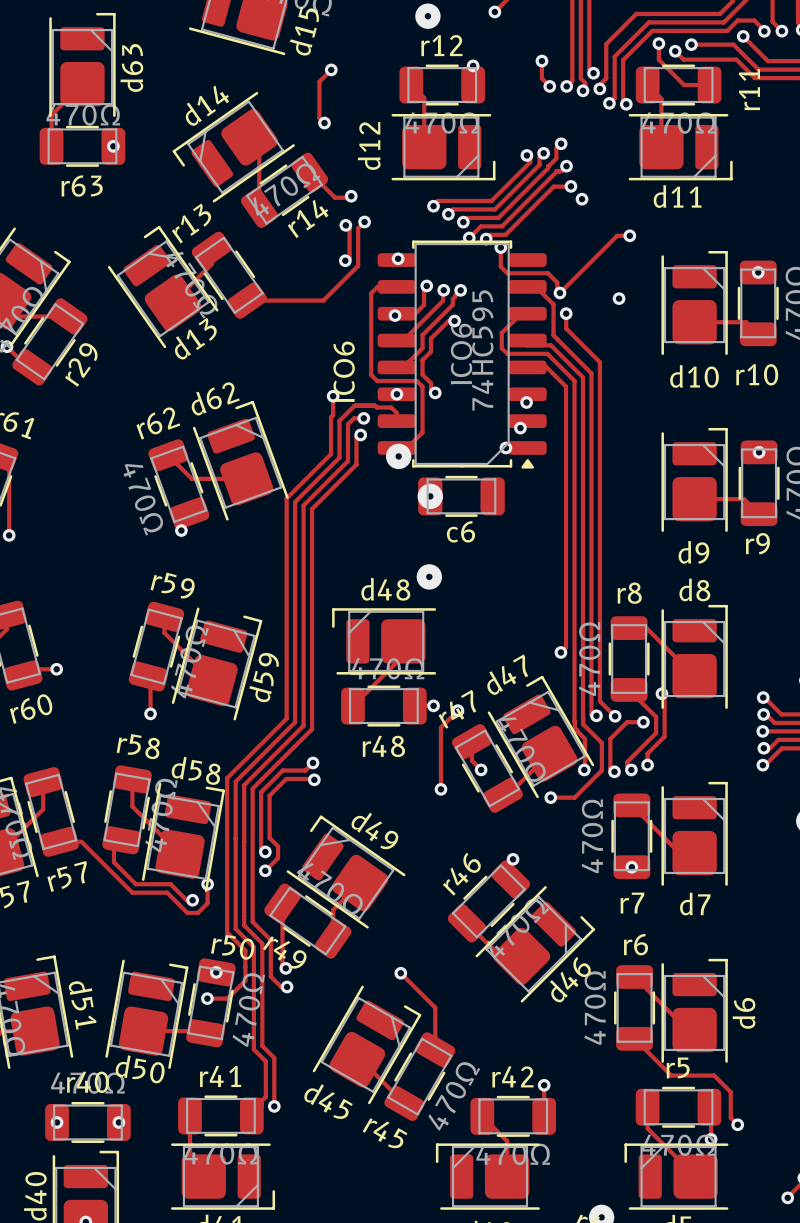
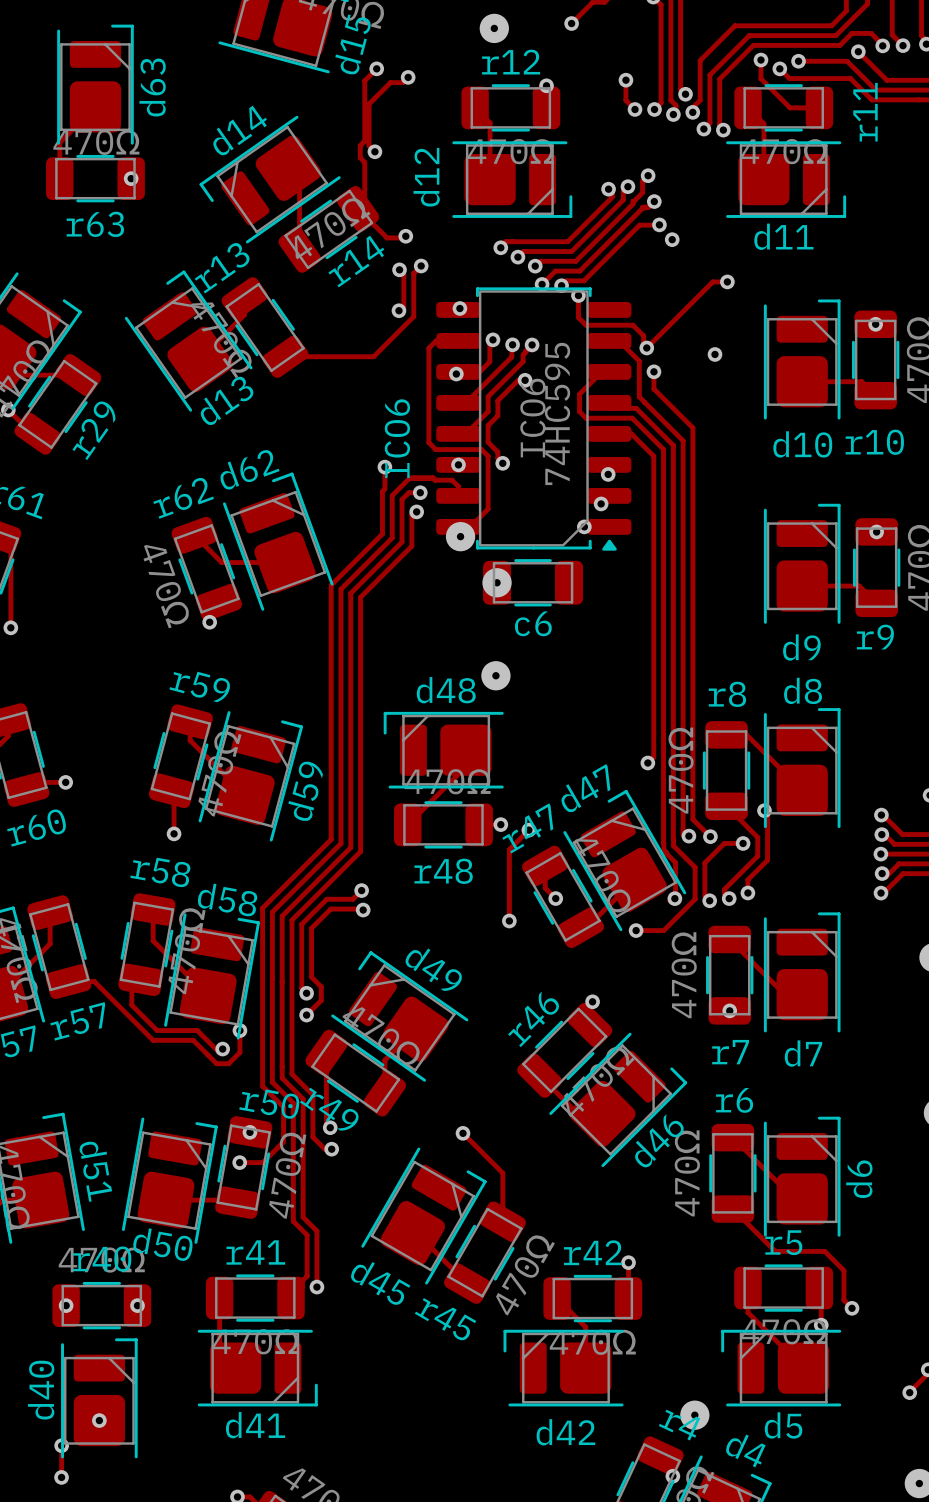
track: none -> (376, 68) (364, 80) (364, 141) (360, 145) (360, 157) (364, 162) (364, 202) (359, 207)
via: none -> (376, 68)
track: none -> (408, 77) (402, 82) (390, 82) (382, 90)
via: none -> (408, 77)
via: (331, 69) -> none

